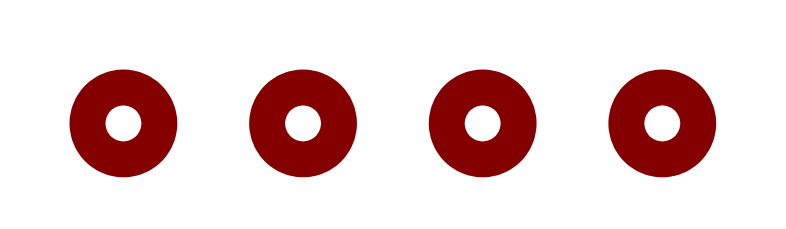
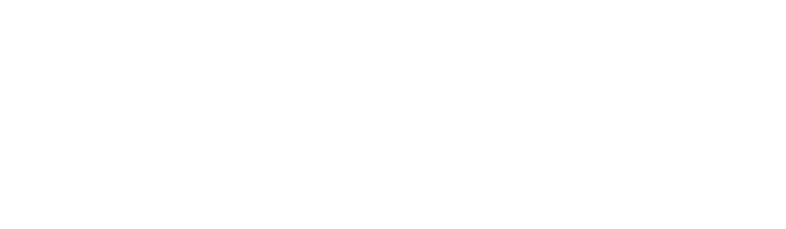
part: (123, 123) -> none
part: (303, 123) -> none
part: (482, 123) -> none
part: (662, 123) -> none

